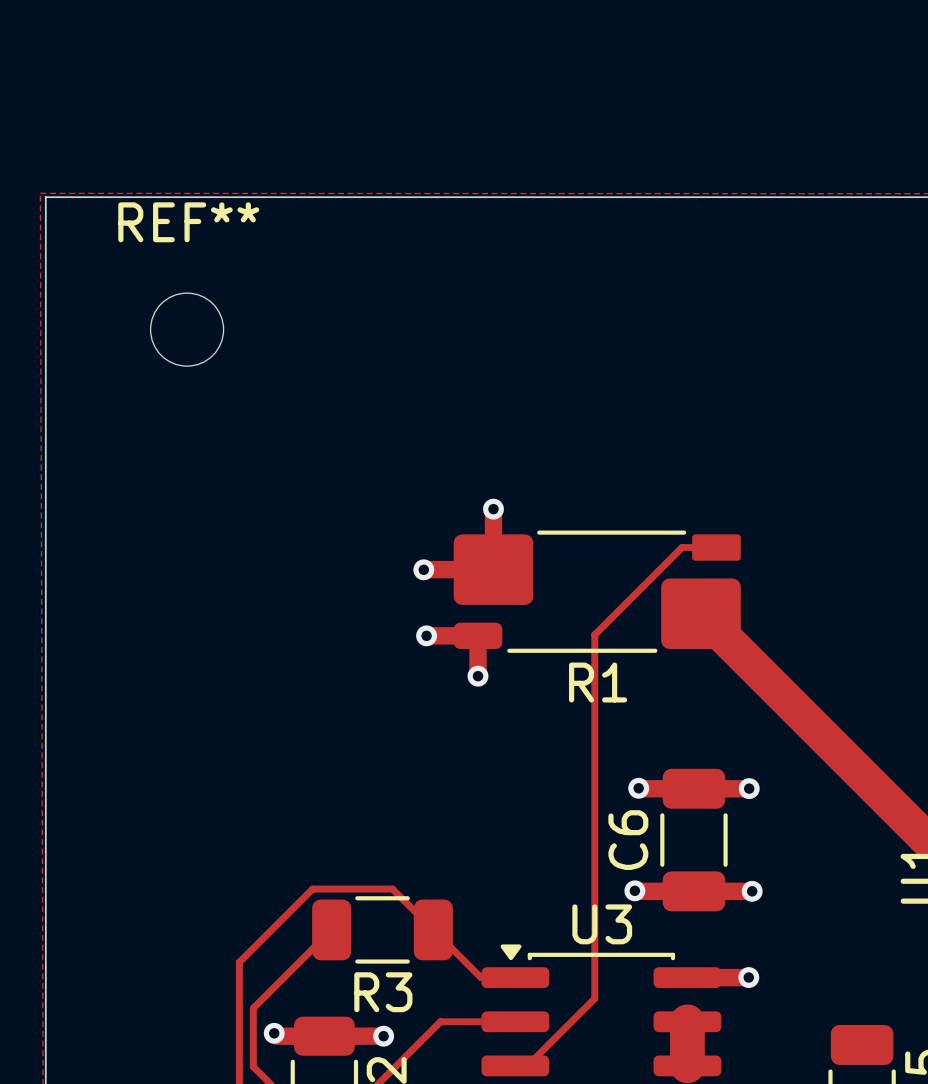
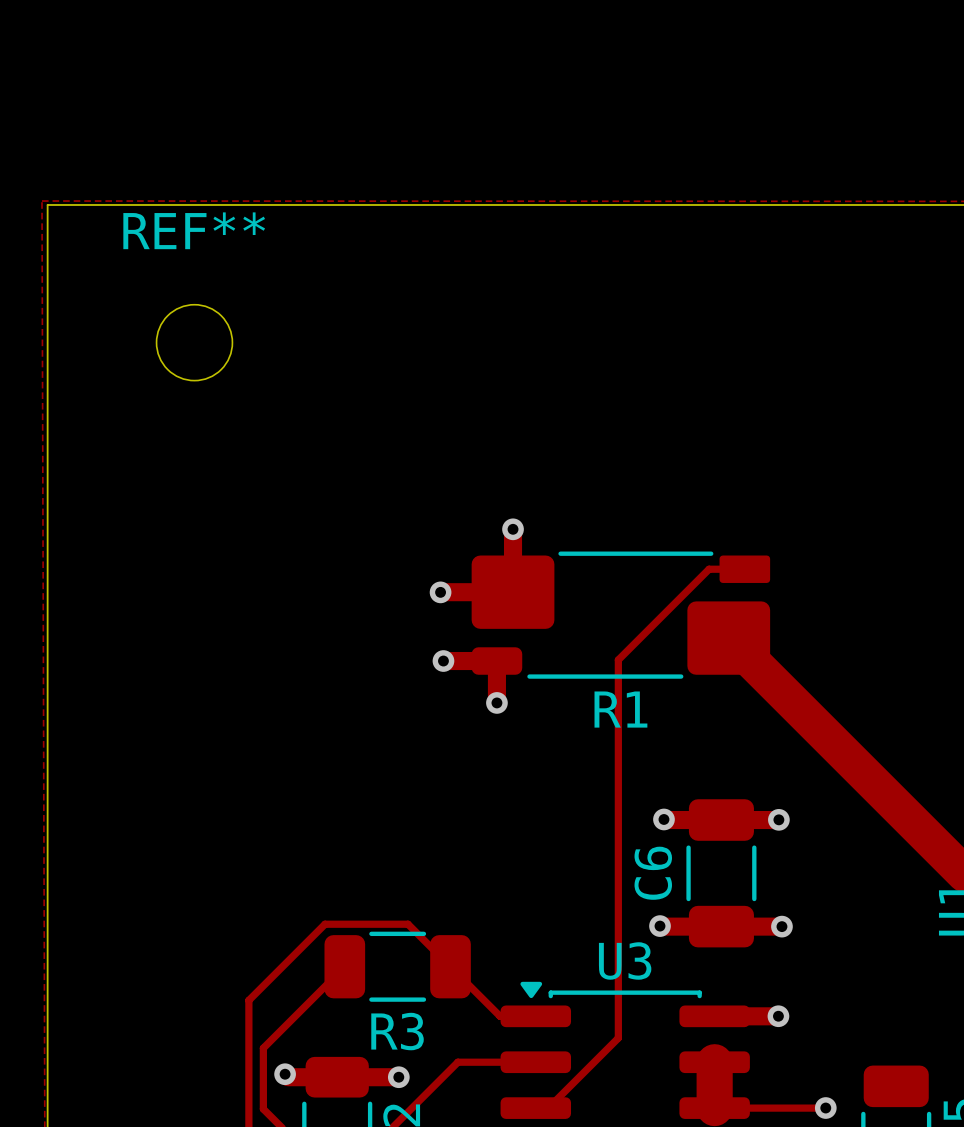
track: none -> (714, 1108) (825, 1108)
via: none -> (825, 1108)

